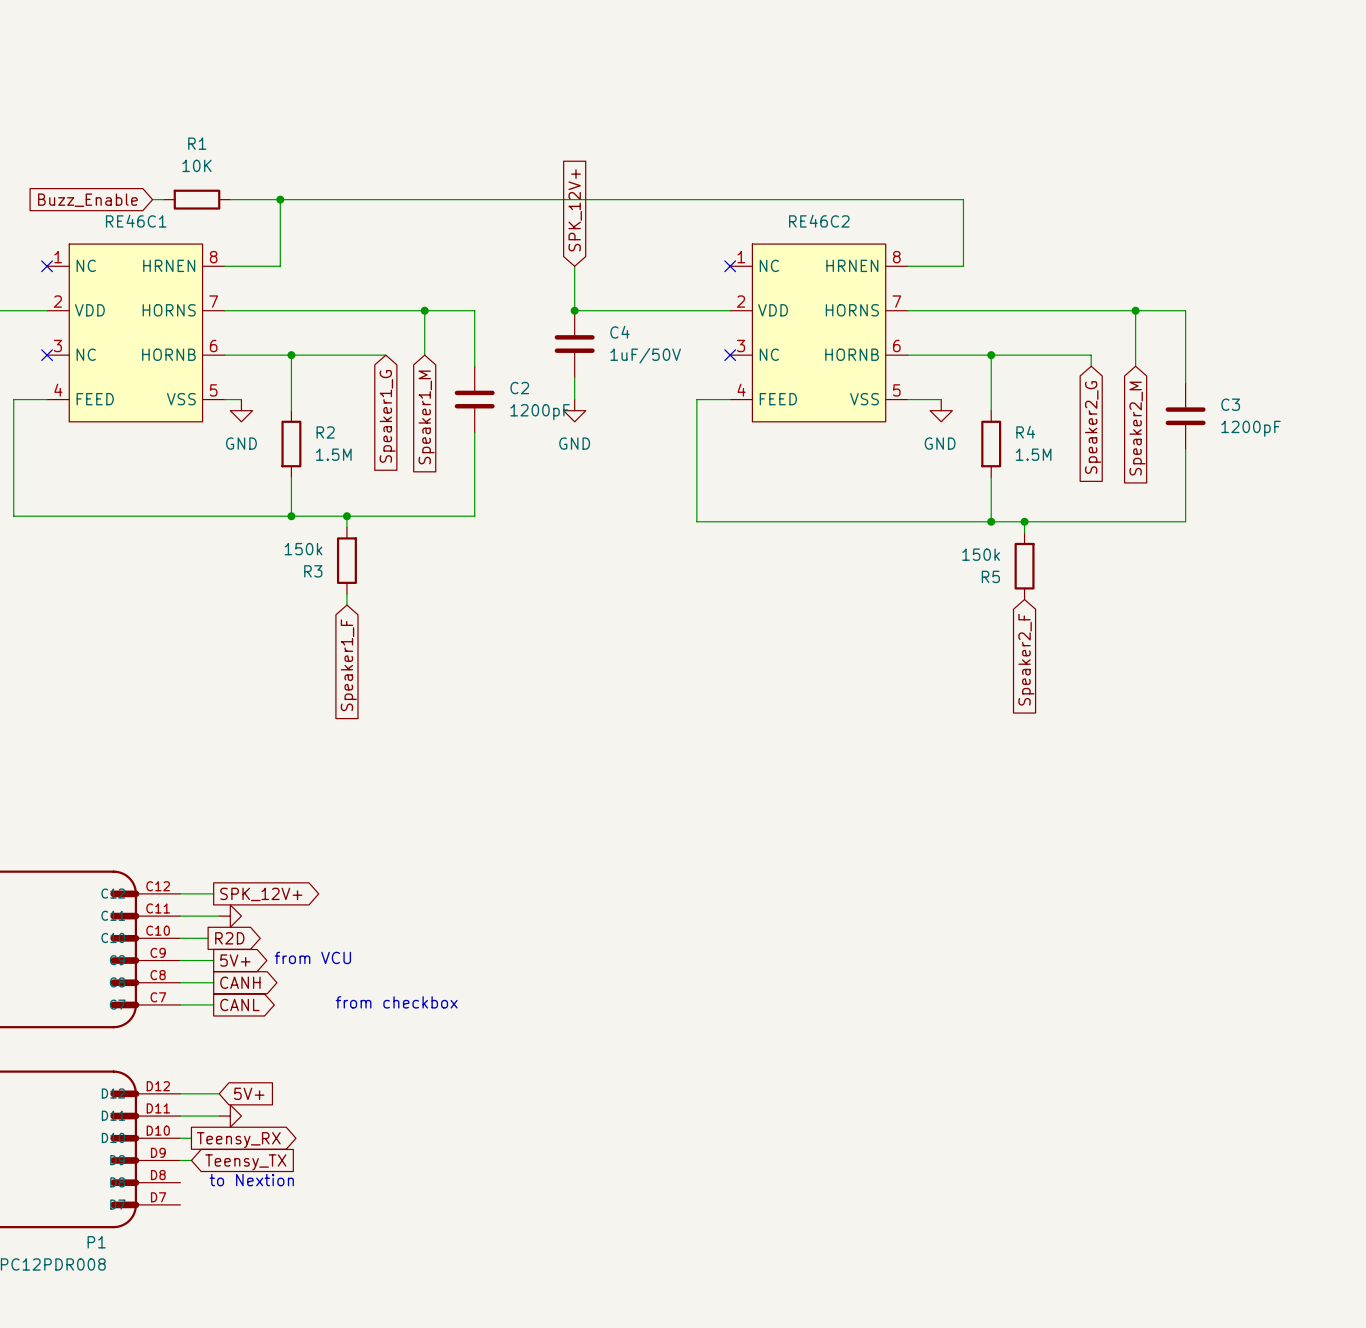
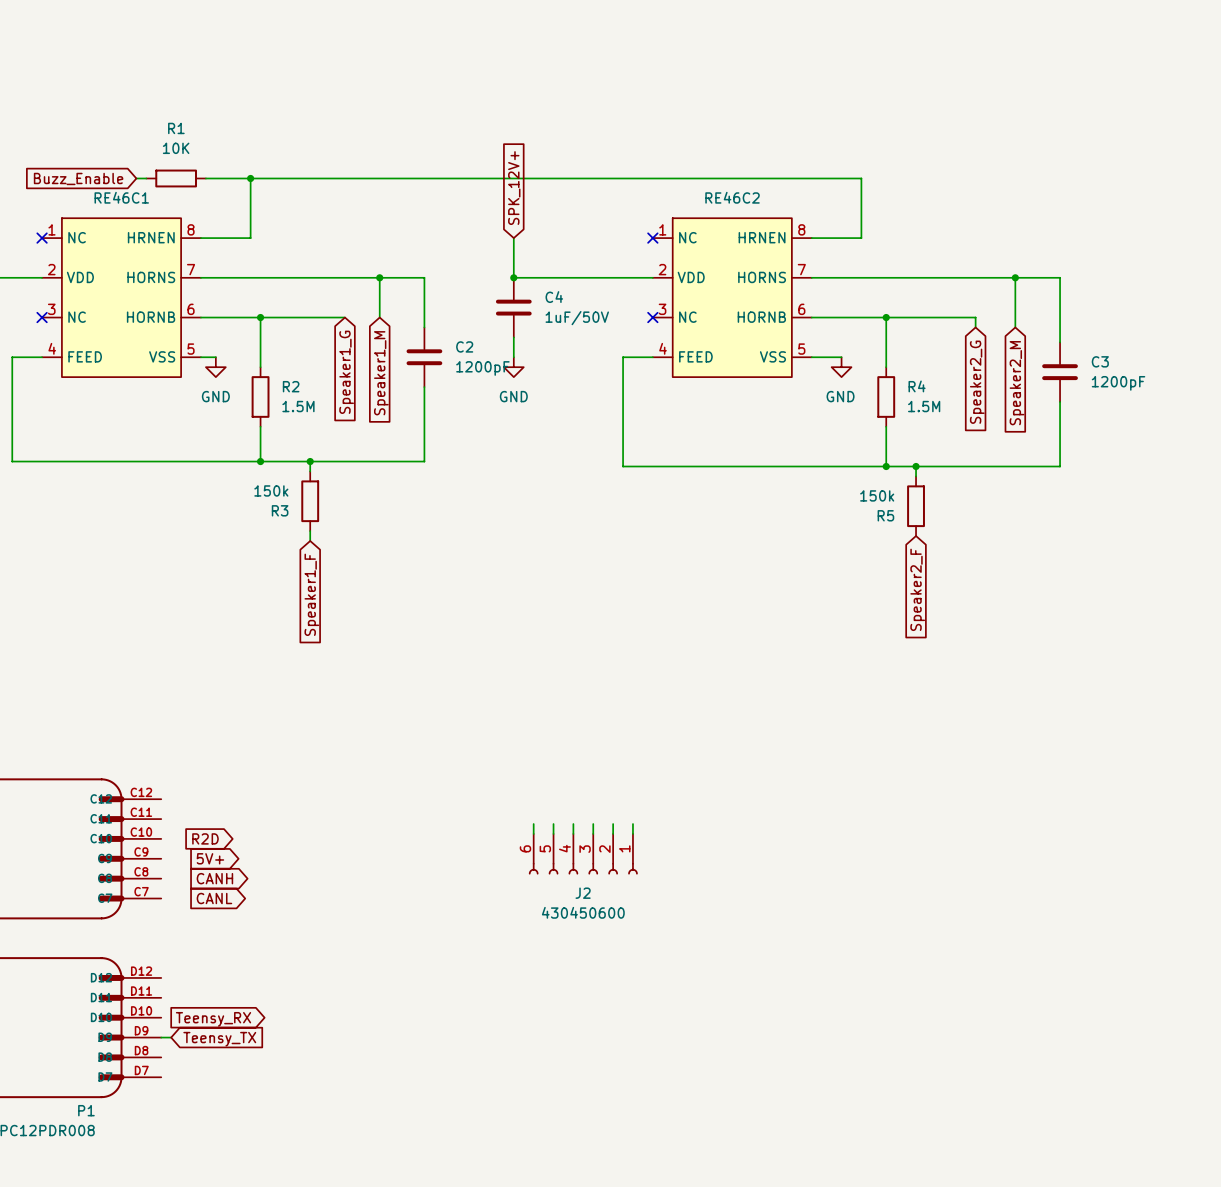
wire: (180, 893) (213, 893) -> none
global label: SPK_12V+ (261, 894) -> none
wire: (180, 916) (219, 916) -> none
power symbol: (230, 916) -> none
wire: none -> (533, 824) (533, 833)
wire: none -> (553, 824) (553, 833)
wire: none -> (573, 824) (573, 833)
wire: none -> (593, 824) (593, 833)
wire: none -> (613, 824) (613, 833)
wire: none -> (632, 824) (632, 833)
wire: (180, 938) (208, 938) -> none
J2: none -> 430450600 (583, 854)
text: from VCU (312, 957) -> none
wire: (180, 960) (213, 960) -> none
wire: (180, 982) (213, 982) -> none
text: from checkbox (396, 1002) -> none
wire: (180, 1004) (213, 1004) -> none
wire: (180, 1093) (219, 1093) -> none
global label: 5V+ (249, 1093) -> none
wire: (180, 1116) (219, 1116) -> none
power symbol: (230, 1116) -> none
wire: (180, 1138) (191, 1138) -> none
text: to Nextion (251, 1180) -> none

